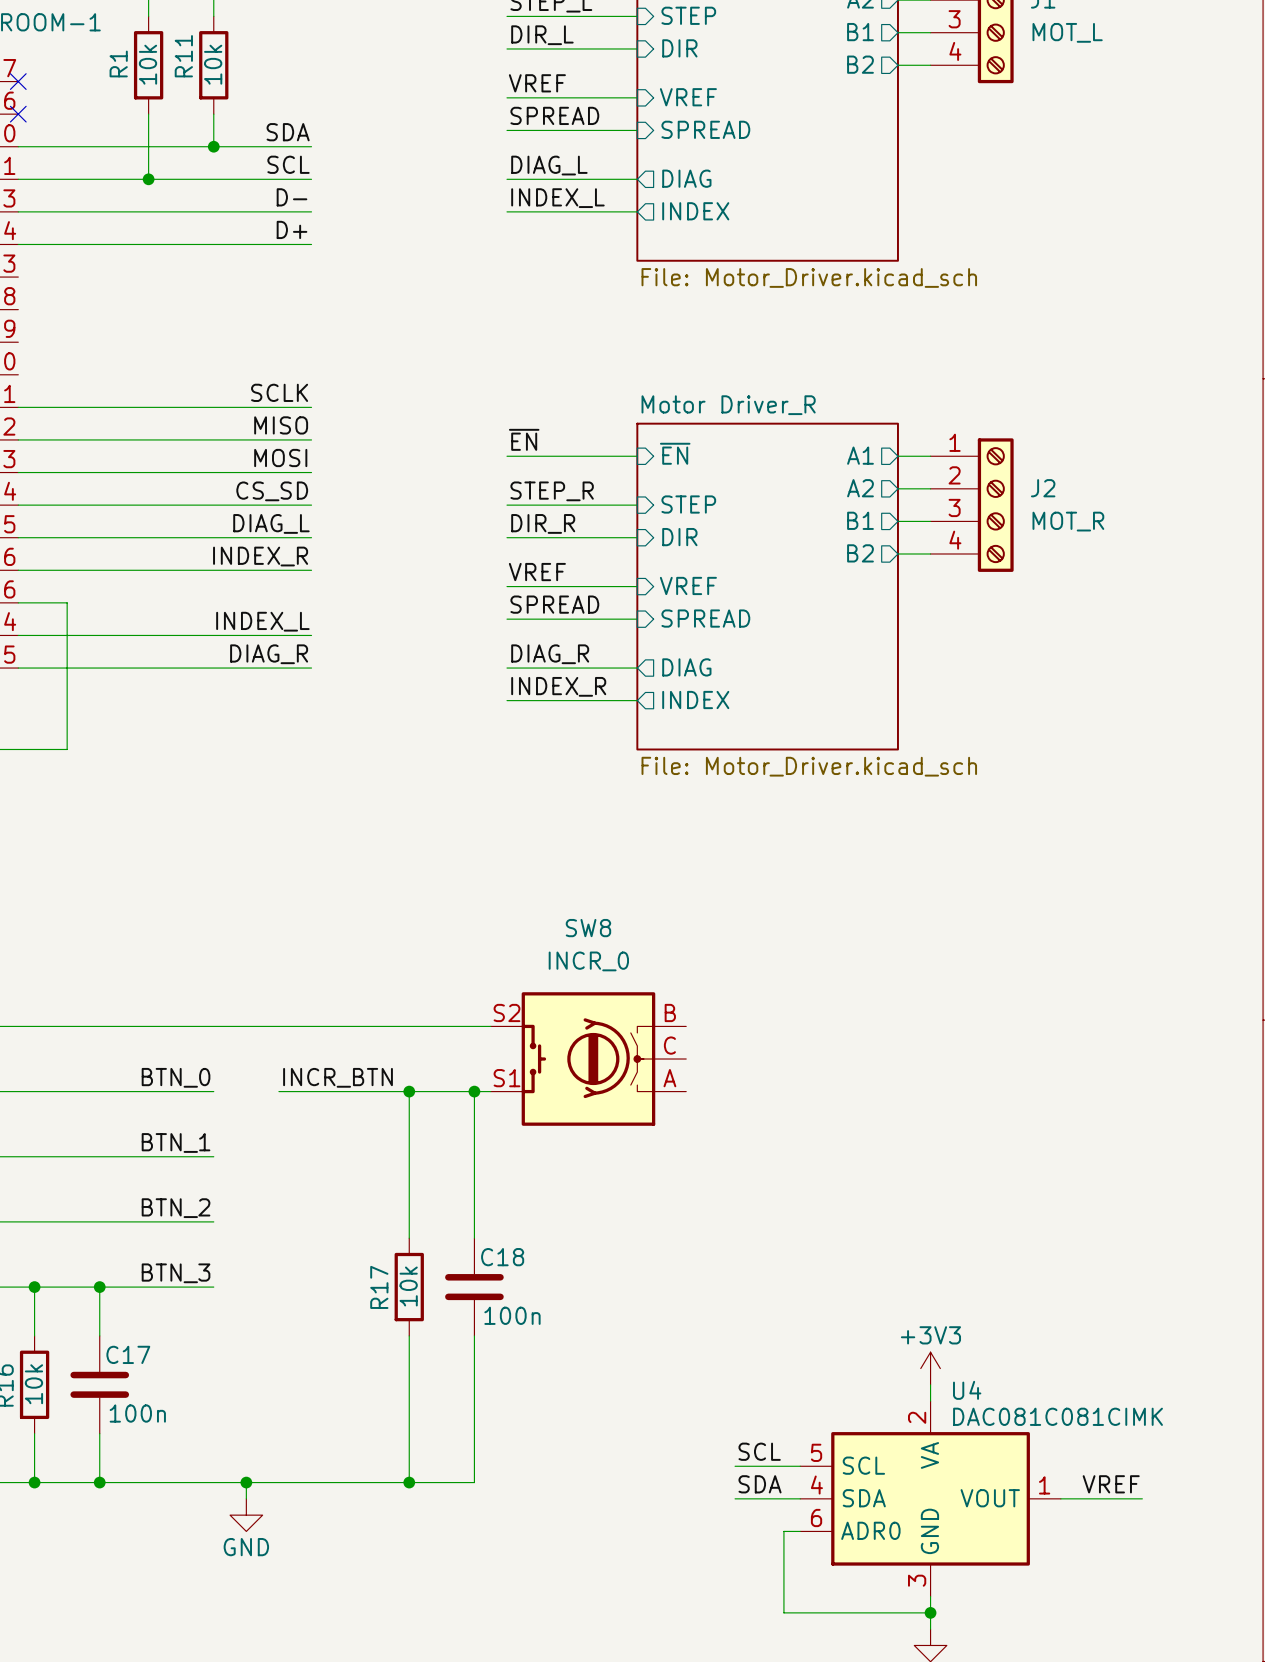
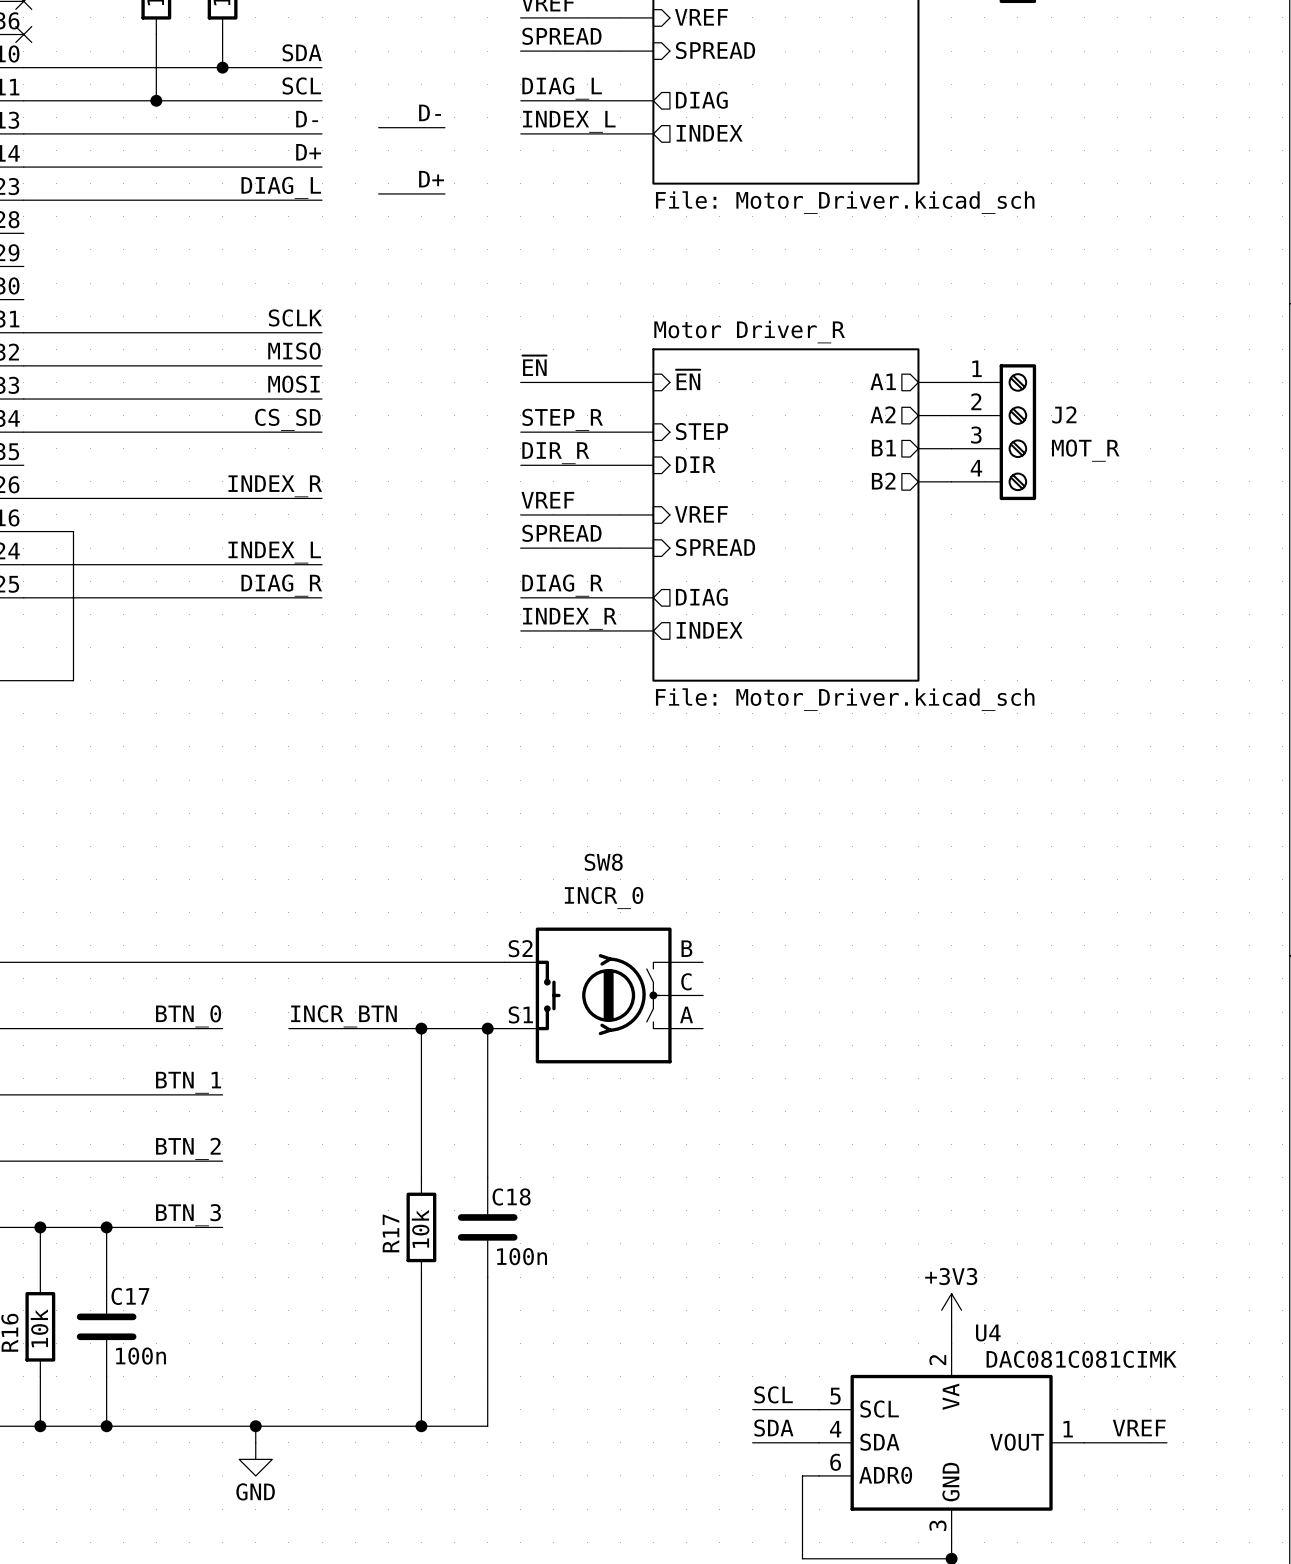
label: none -> D- (430, 112)
wire: none -> (378, 127) (444, 127)
label: none -> D+ (431, 179)
wire: none -> (378, 193) (444, 193)
label position: DIAG_L (271, 523) -> DIAG_L (281, 187)
wire: (18, 537) (311, 537) -> (23, 200) (322, 200)

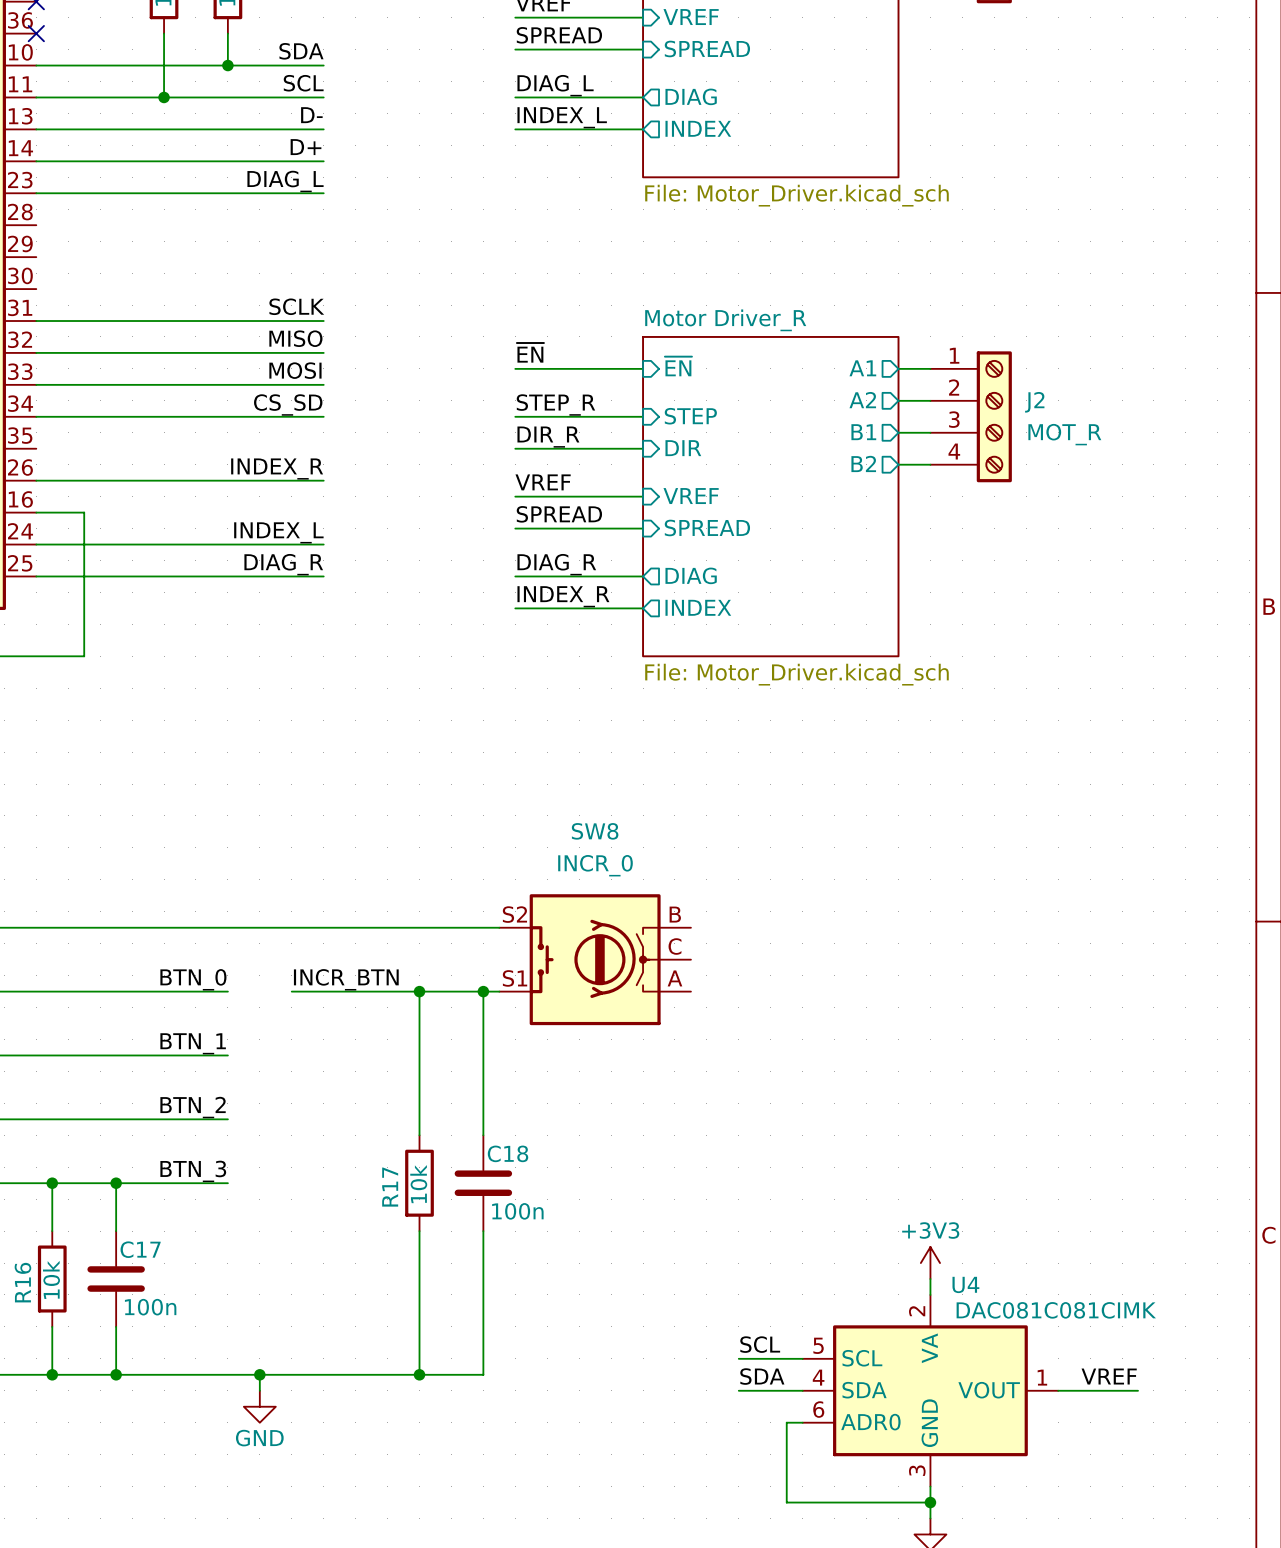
label: D- (430, 112) -> none
wire: (378, 127) (444, 127) -> none
label: D+ (431, 179) -> none
wire: (378, 193) (444, 193) -> none

